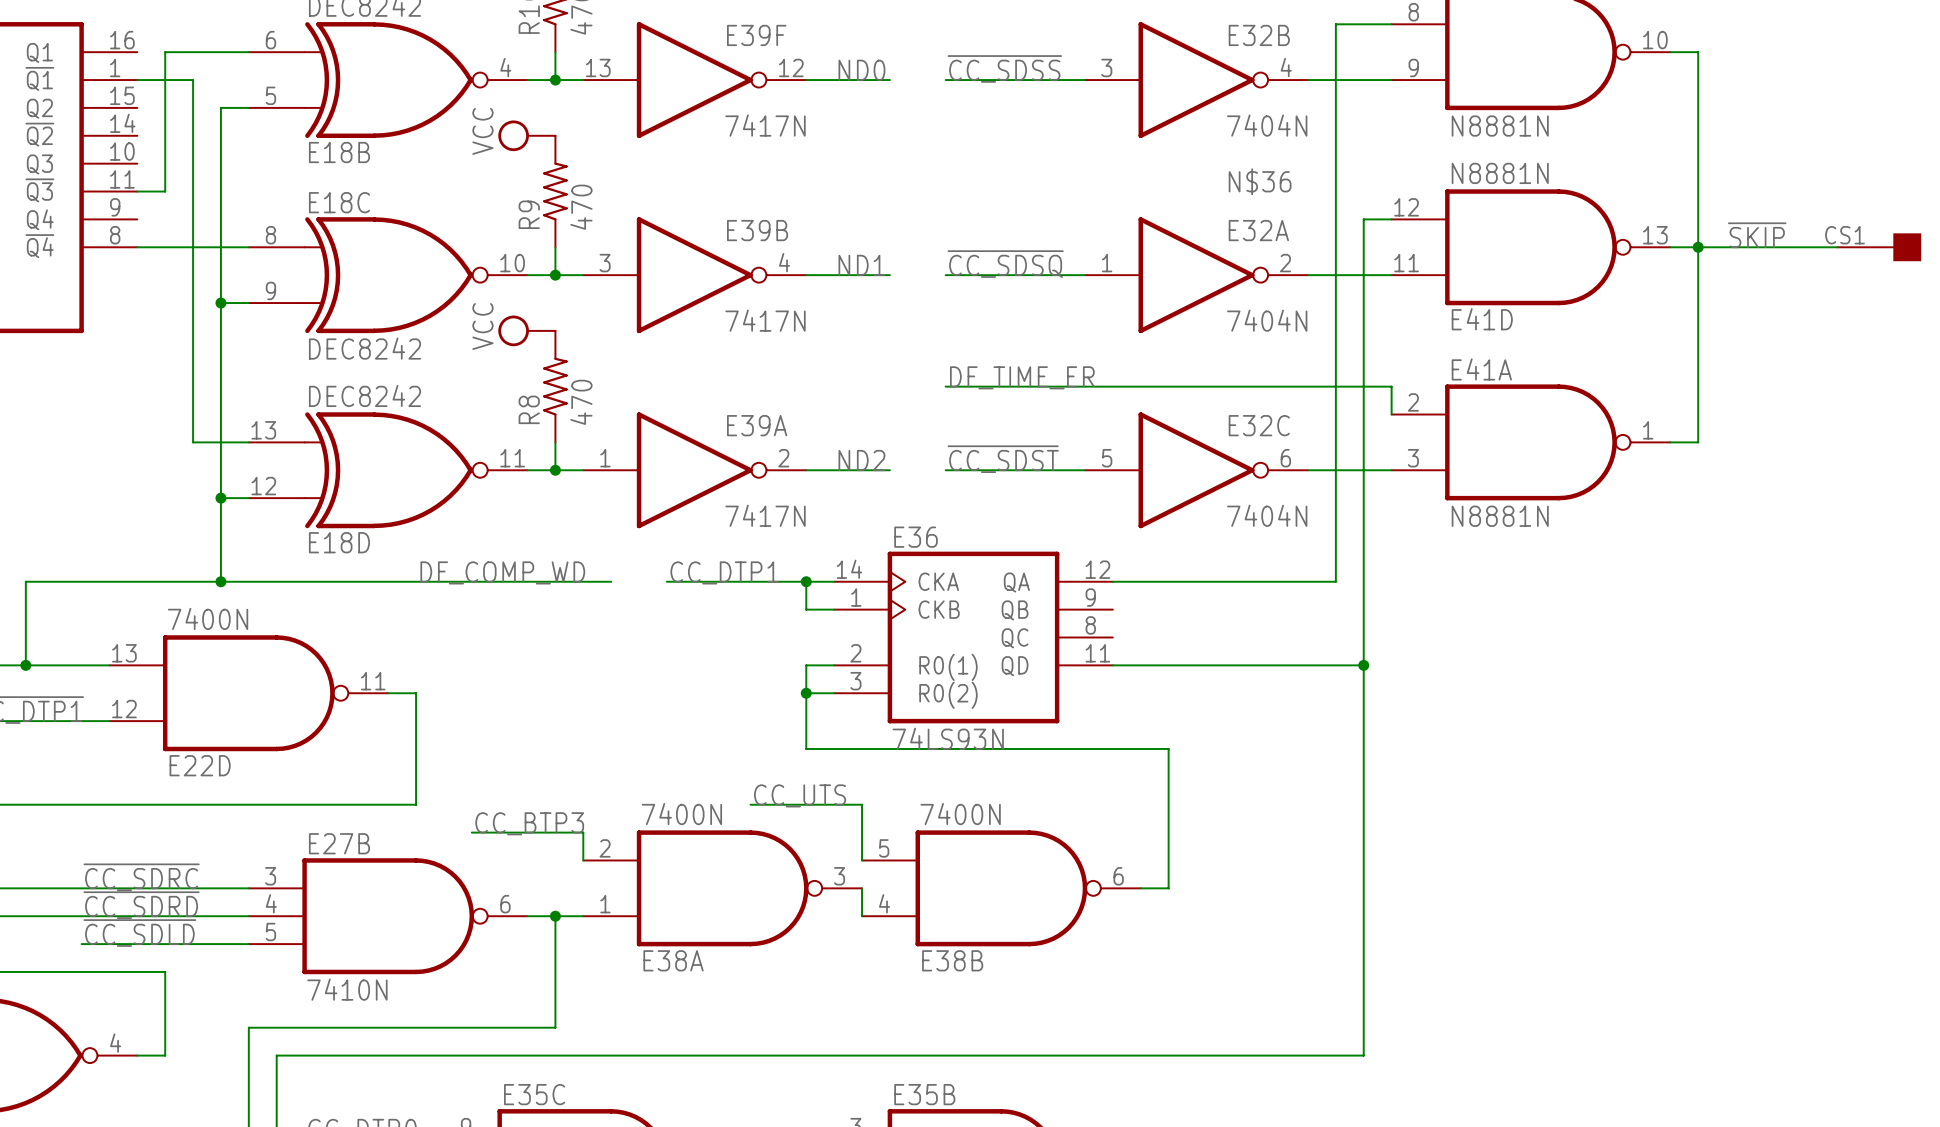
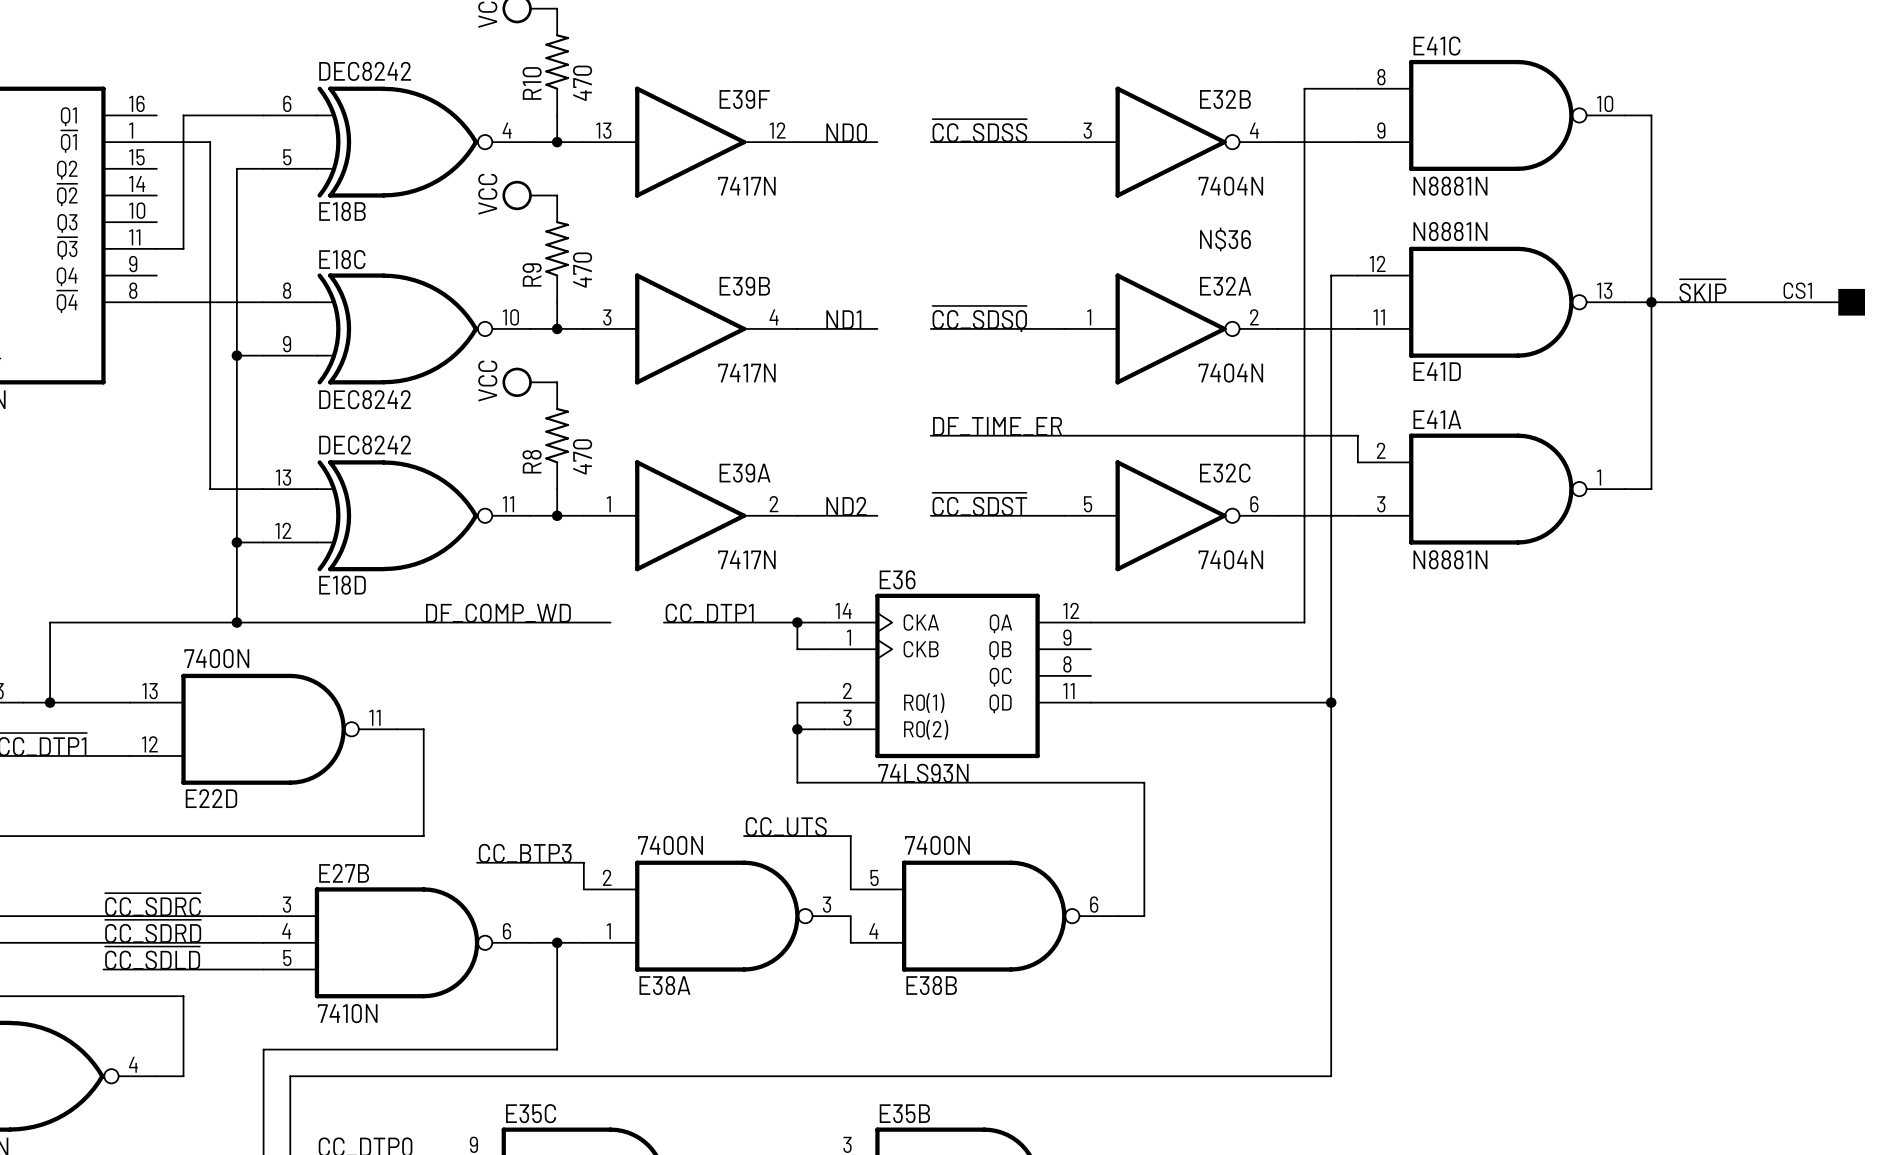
E39F symbol: [583, 22, 807, 139] -> [583, 86, 798, 198]
E39B symbol: [583, 217, 807, 334] -> [583, 273, 798, 385]
E39A symbol: [583, 412, 807, 529] -> [583, 460, 798, 572]

